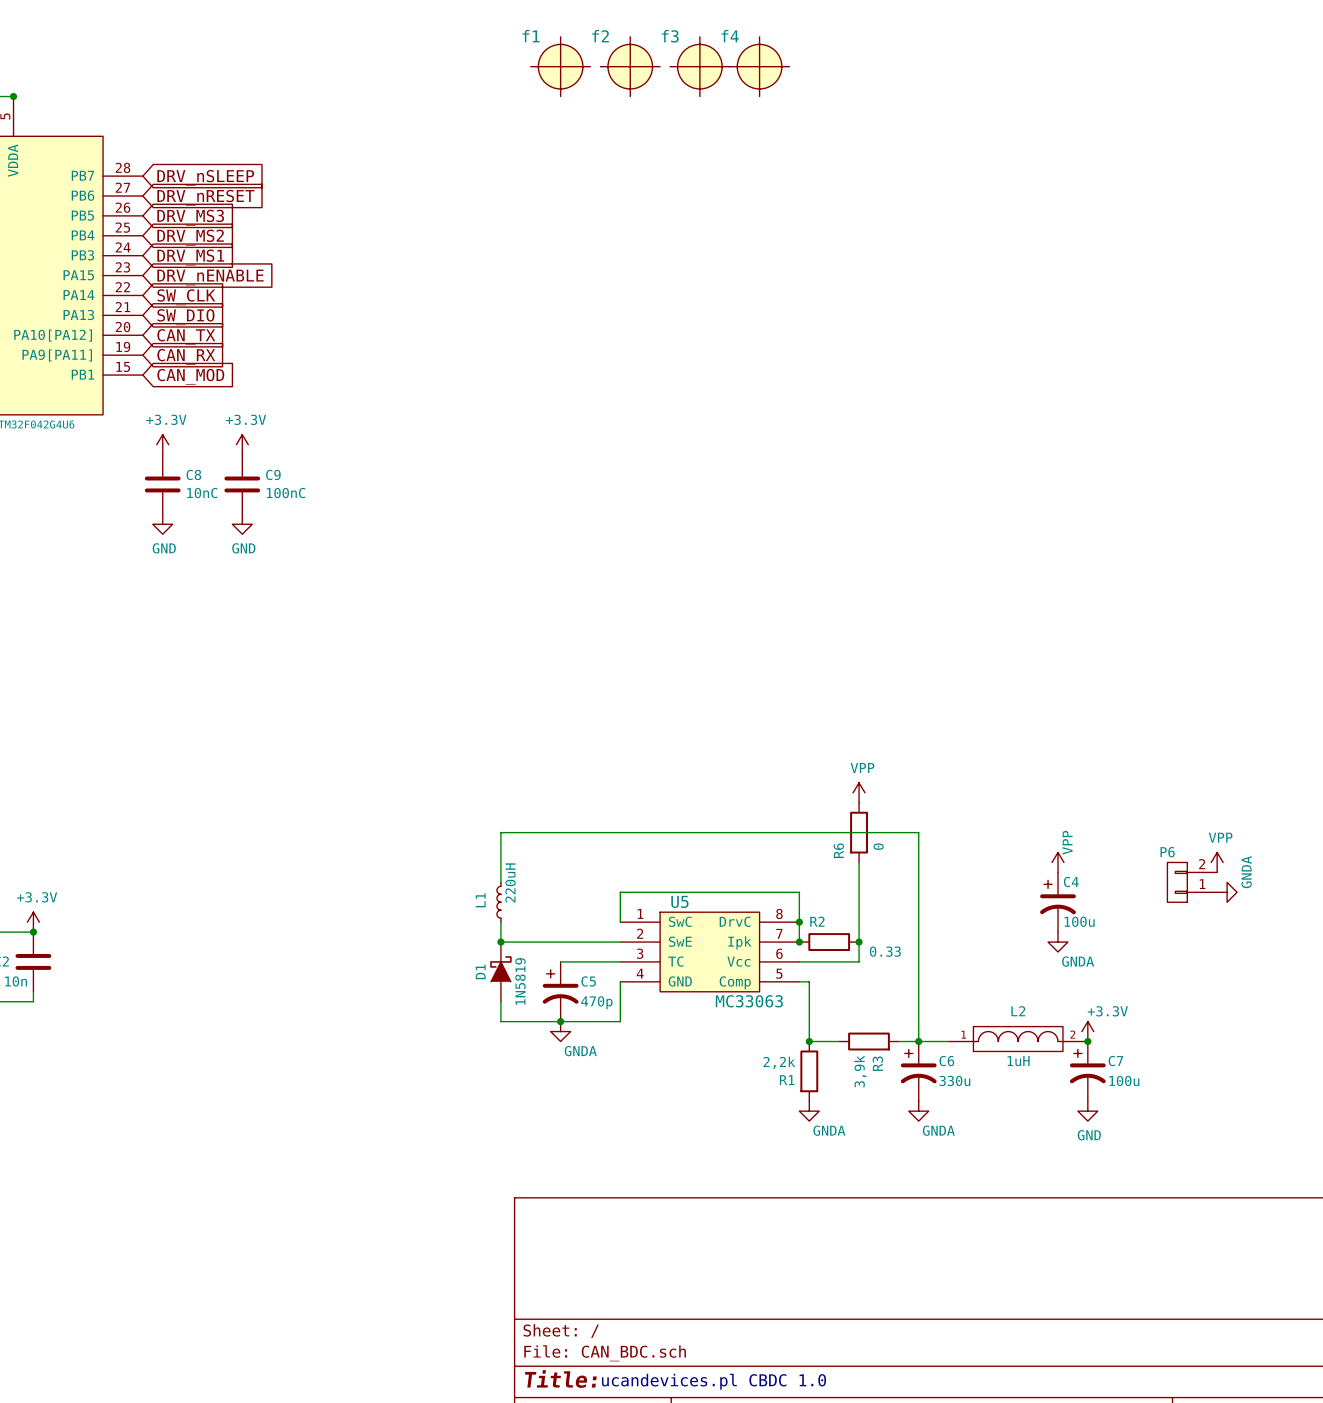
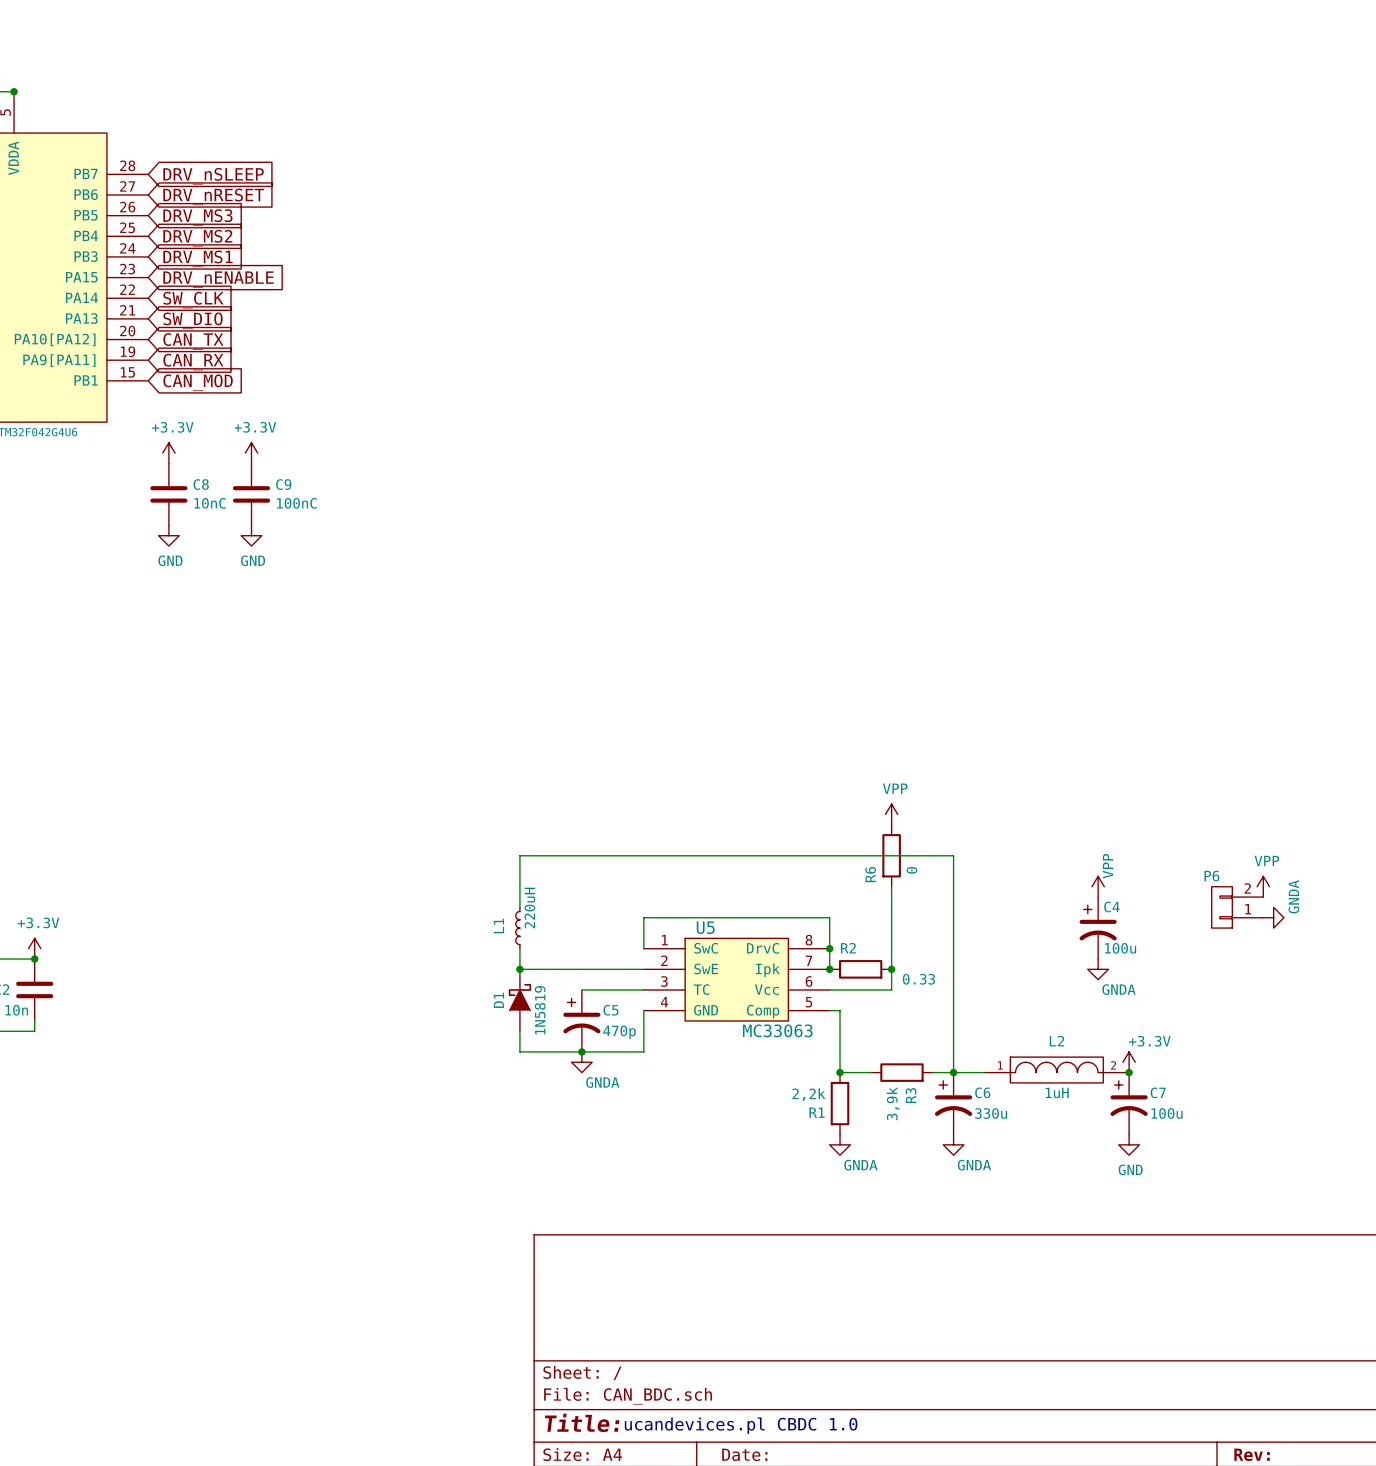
f1: (560, 66) -> none
f2: (630, 66) -> none
f3: (699, 66) -> none
f4: (759, 66) -> none

